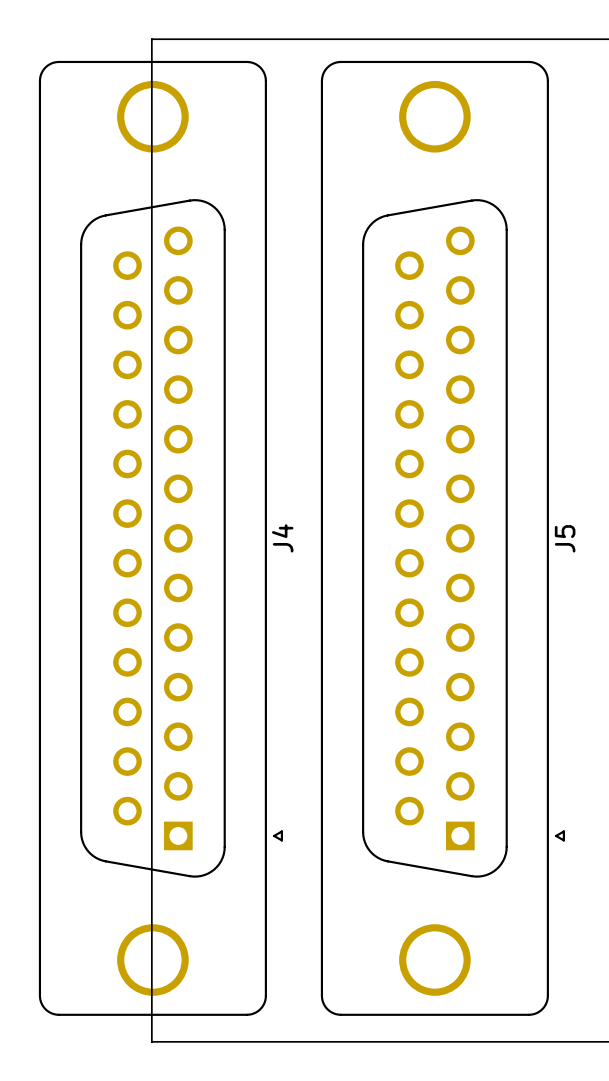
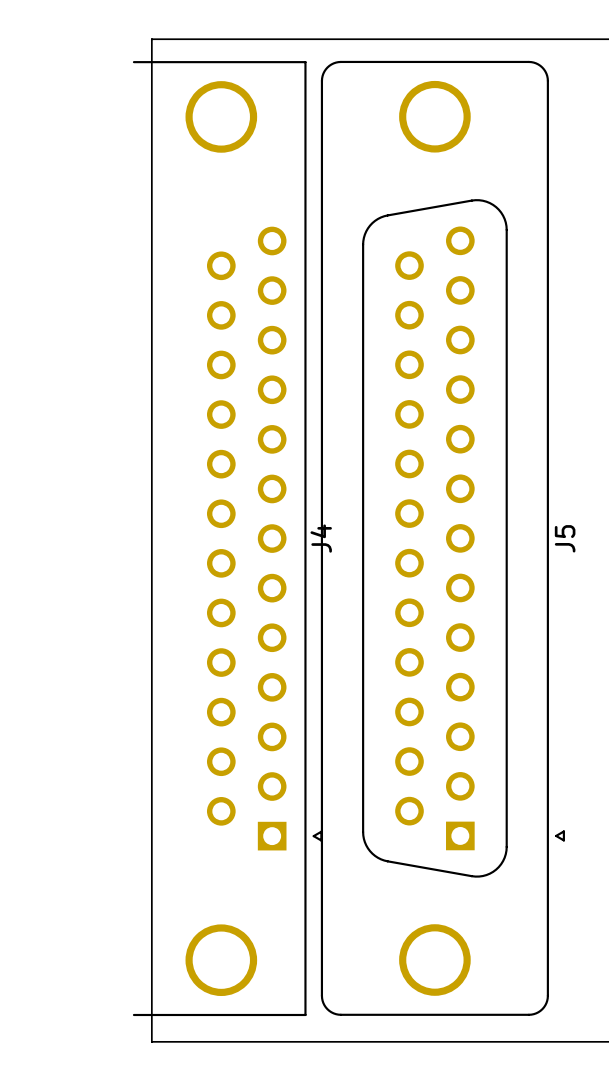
J4 footprint: [38, 60, 283, 1016] -> [132, 61, 323, 1017]

